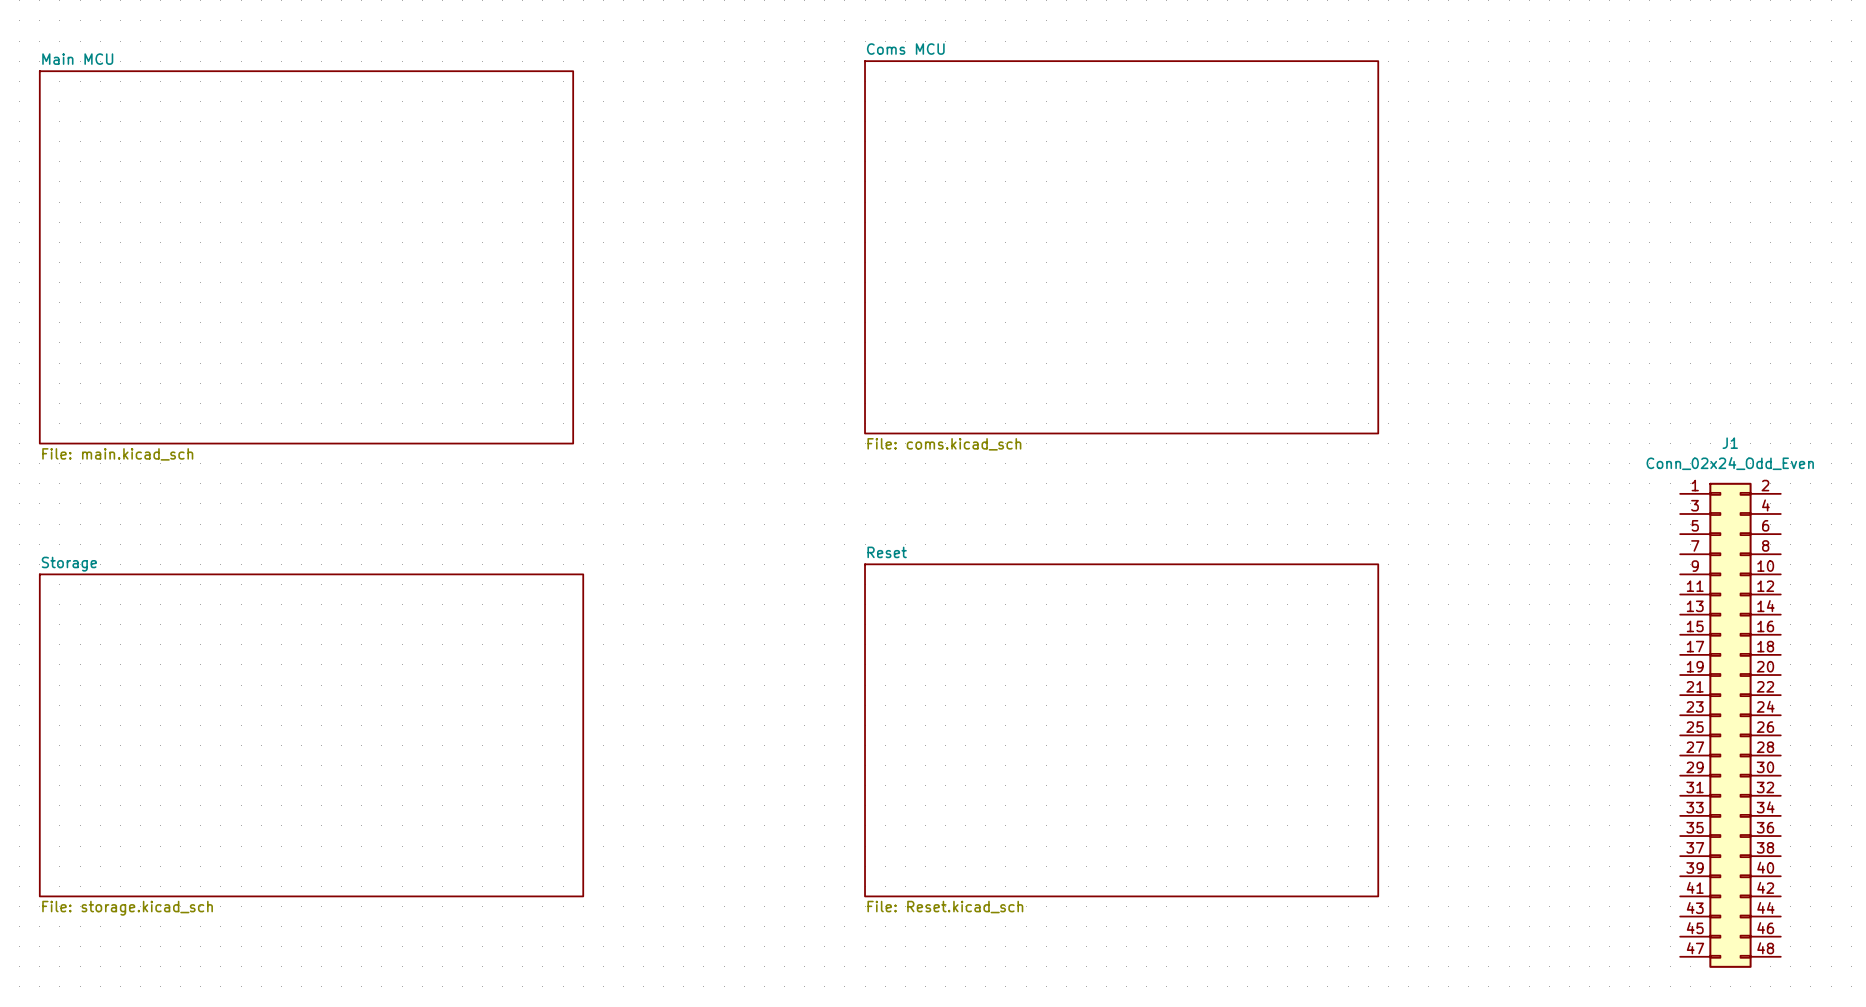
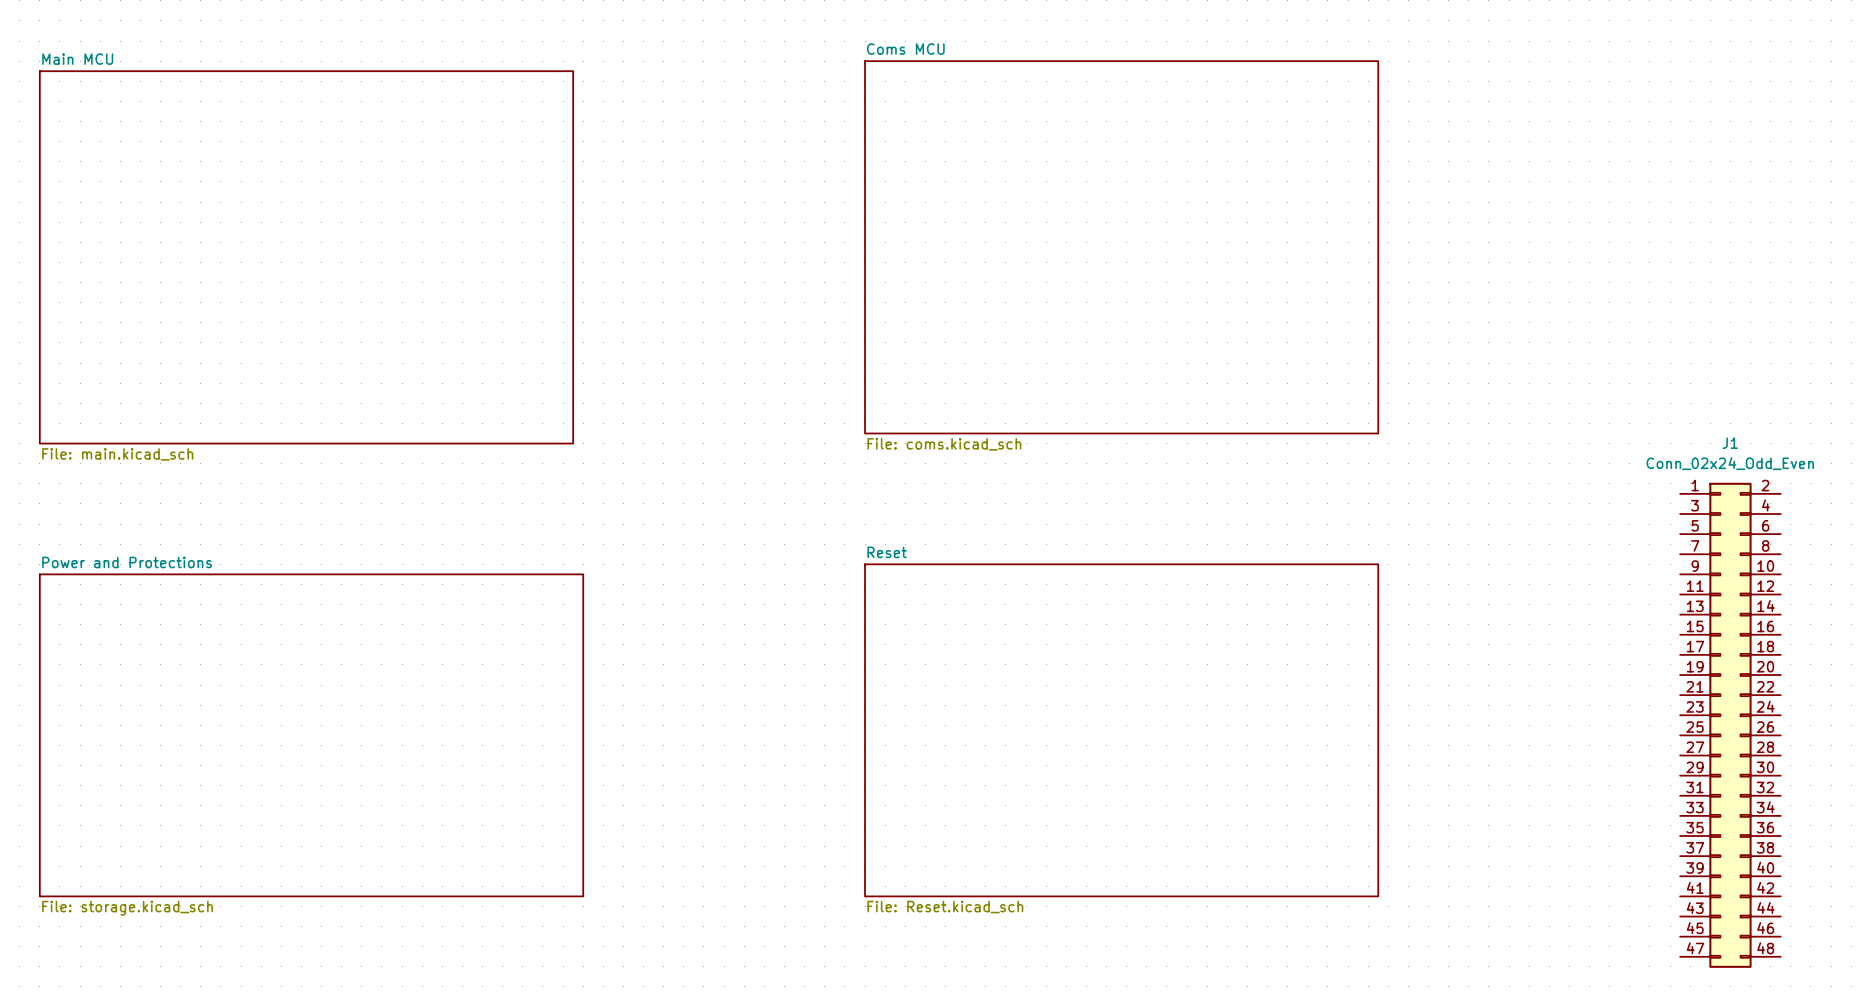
sheet Storage name: Storage (69, 564) -> Power and Protections (127, 562)

